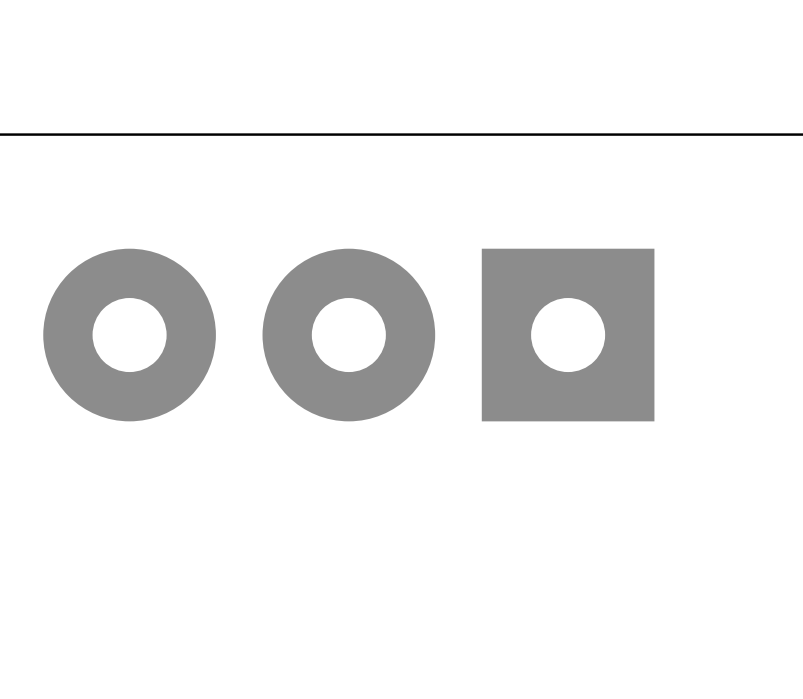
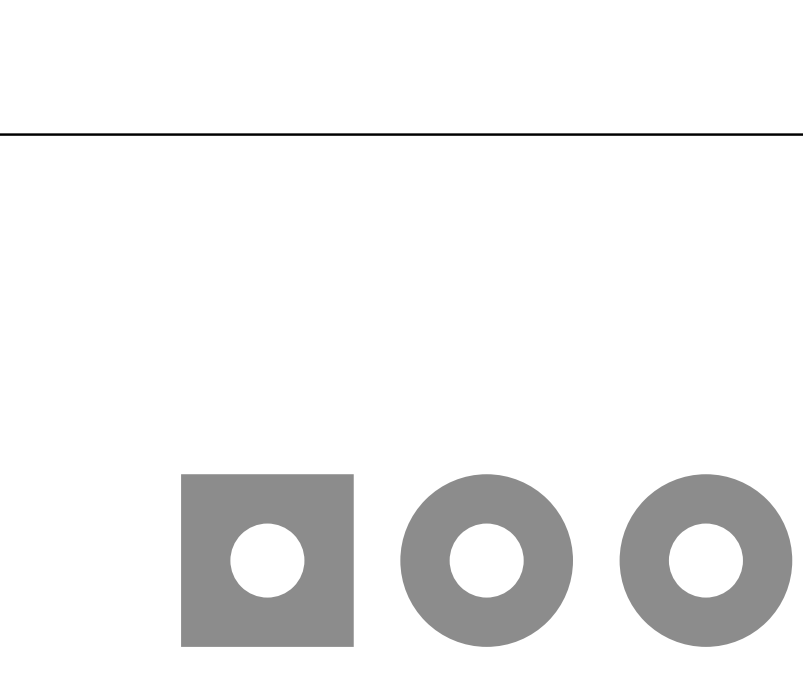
part rotation: 0° (348, 335) -> 180° (486, 560)

